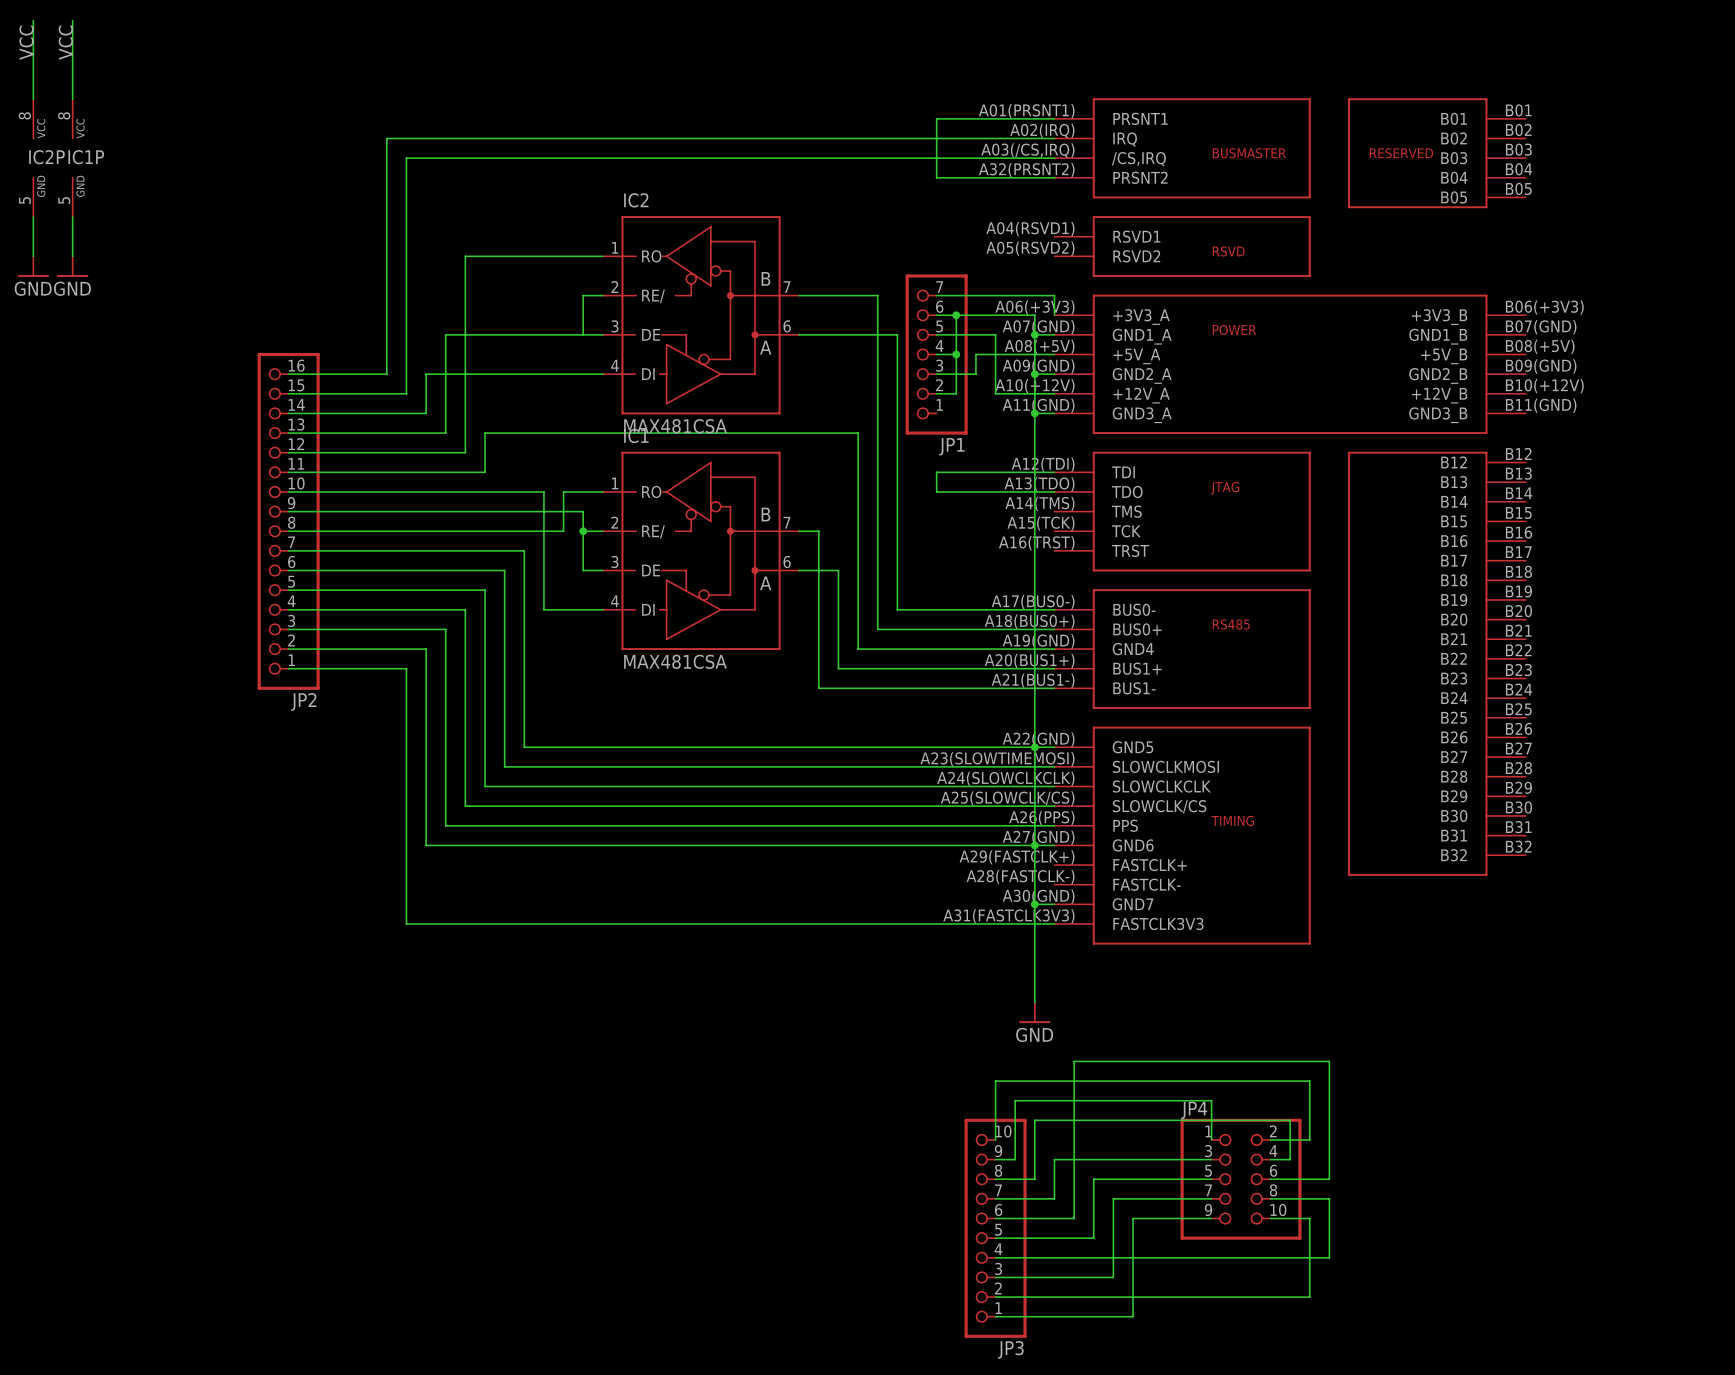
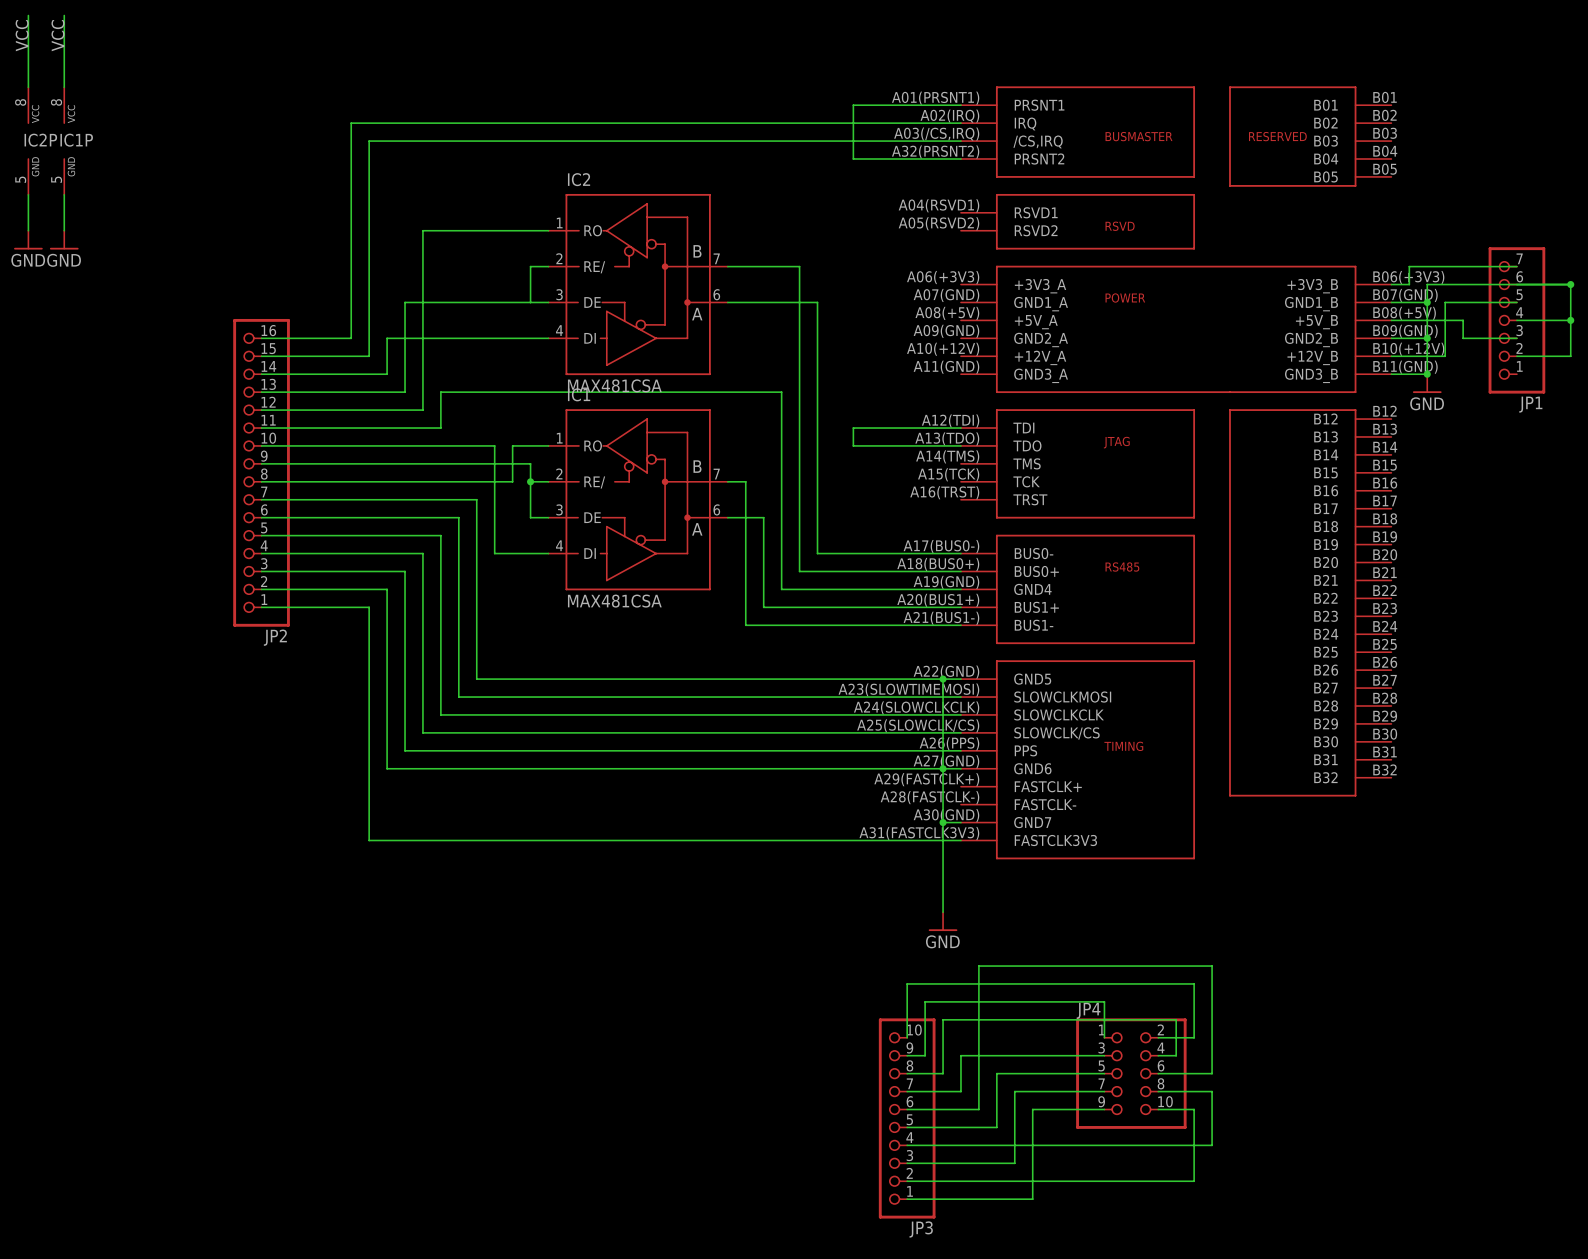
wire: (936, 295) (1054, 295) (1054, 315) -> none
wire: none -> (1516, 266) (1409, 266) (1409, 284) (1391, 284)
wire: (936, 315) (1034, 315) (1034, 747) -> none
wire: (956, 315) (956, 393) (936, 393) -> none
junction: (956, 315) -> none
junction: none -> (1570, 284)
wire: (936, 334) (995, 334) (995, 393) (1054, 393) -> none
wire: (1034, 334) (1054, 334) -> none
junction: (1034, 334) -> none
wire: none -> (1391, 302) (1427, 302)
junction: none -> (1427, 302)
wire: none -> (1516, 302) (1445, 302) (1445, 356) (1391, 356)
wire: (936, 354) (956, 354) -> none
JP1 position: (936, 354) -> (1516, 320)
junction: (956, 354) -> none
wire: (1054, 354) (975, 354) (975, 374) (936, 374) -> none
wire: none -> (1391, 320) (1463, 320) (1463, 338) (1516, 338)
wire: none -> (1516, 320) (1570, 320)
junction: none -> (1570, 320)
wire: (1034, 374) (1054, 374) -> none
junction: (1034, 374) -> none
wire: none -> (1391, 338) (1427, 338)
junction: none -> (1427, 338)
wire: none -> (1516, 356) (1570, 356) (1570, 284) (1427, 284) (1427, 374) (1391, 374)
wire: (1034, 413) (1054, 413) -> none
junction: (1034, 413) -> none
junction: none -> (1427, 374)
power symbol: none -> GND (1427, 383)

